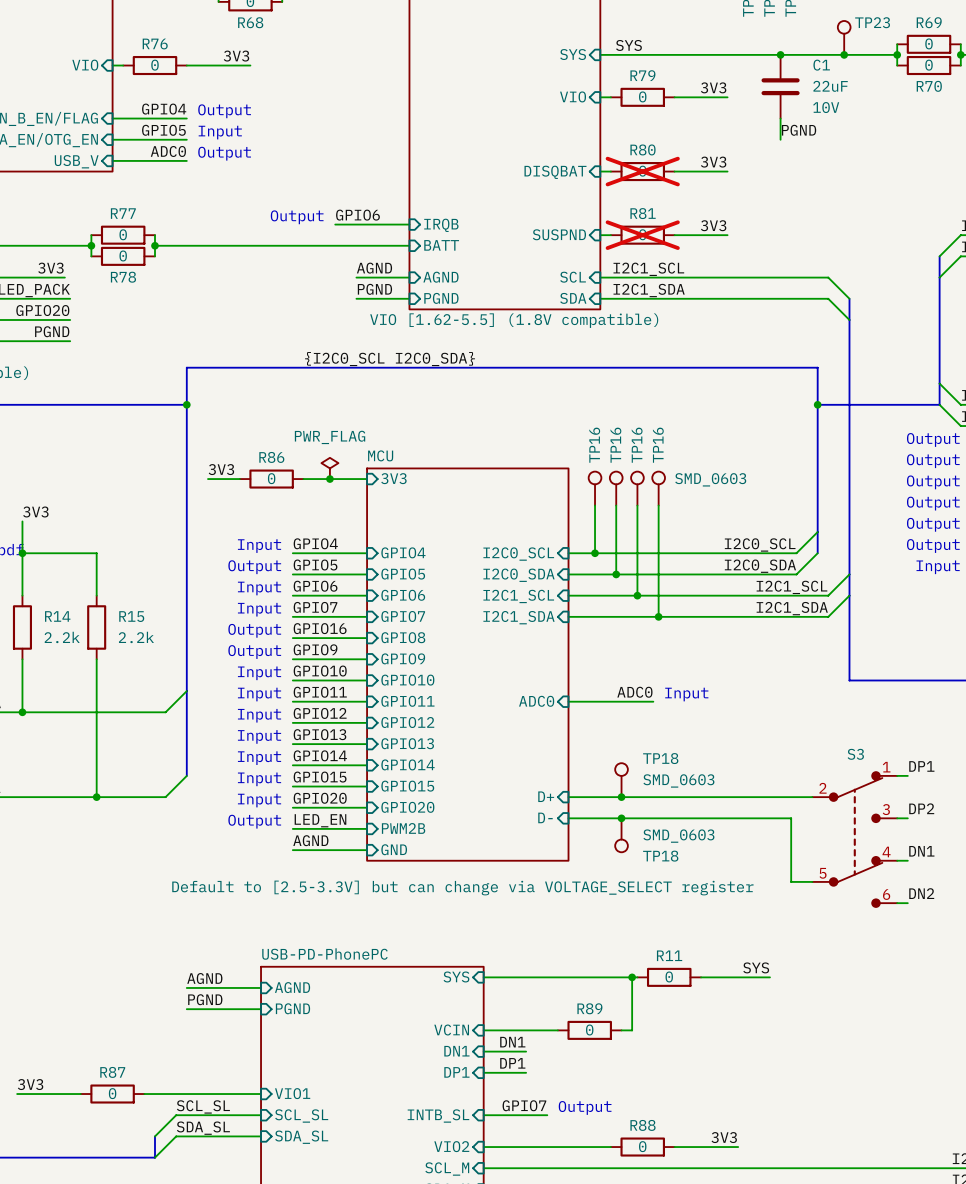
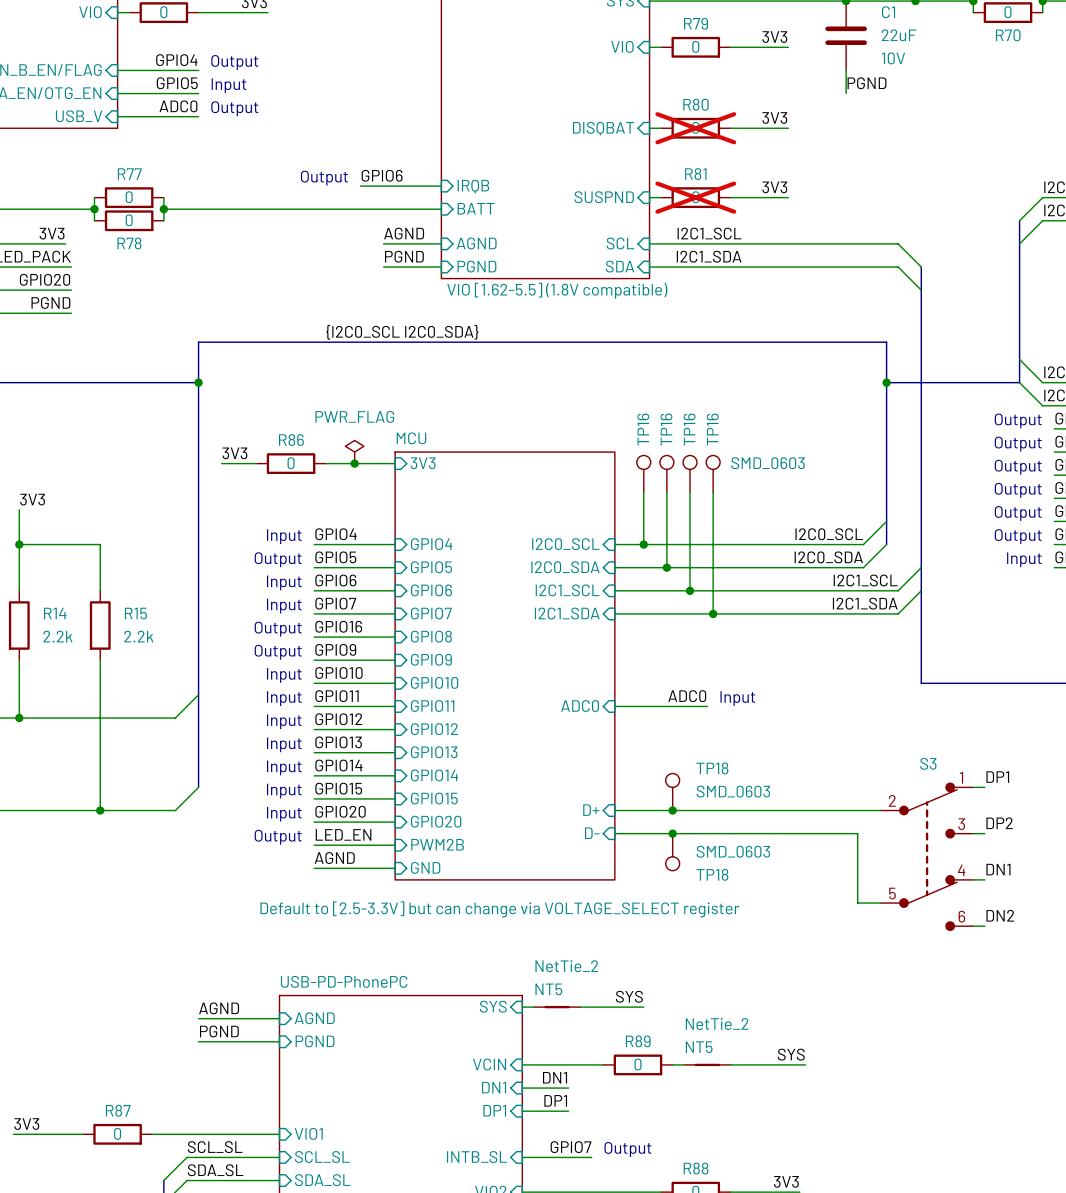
label: none -> SYS (629, 996)
label position: SYS (756, 967) -> SYS (791, 1054)
NT5: none -> NetTie_2 (557, 1007)
wire: (595, 977) (637, 977) -> none
wire: (632, 977) (632, 1030) -> none
junction: (632, 977) -> none
R11: 0 (669, 977) -> none
wire: (701, 977) (769, 977) -> (730, 1064) (805, 1064)
NT5: none -> NetTie_2 (707, 1064)

